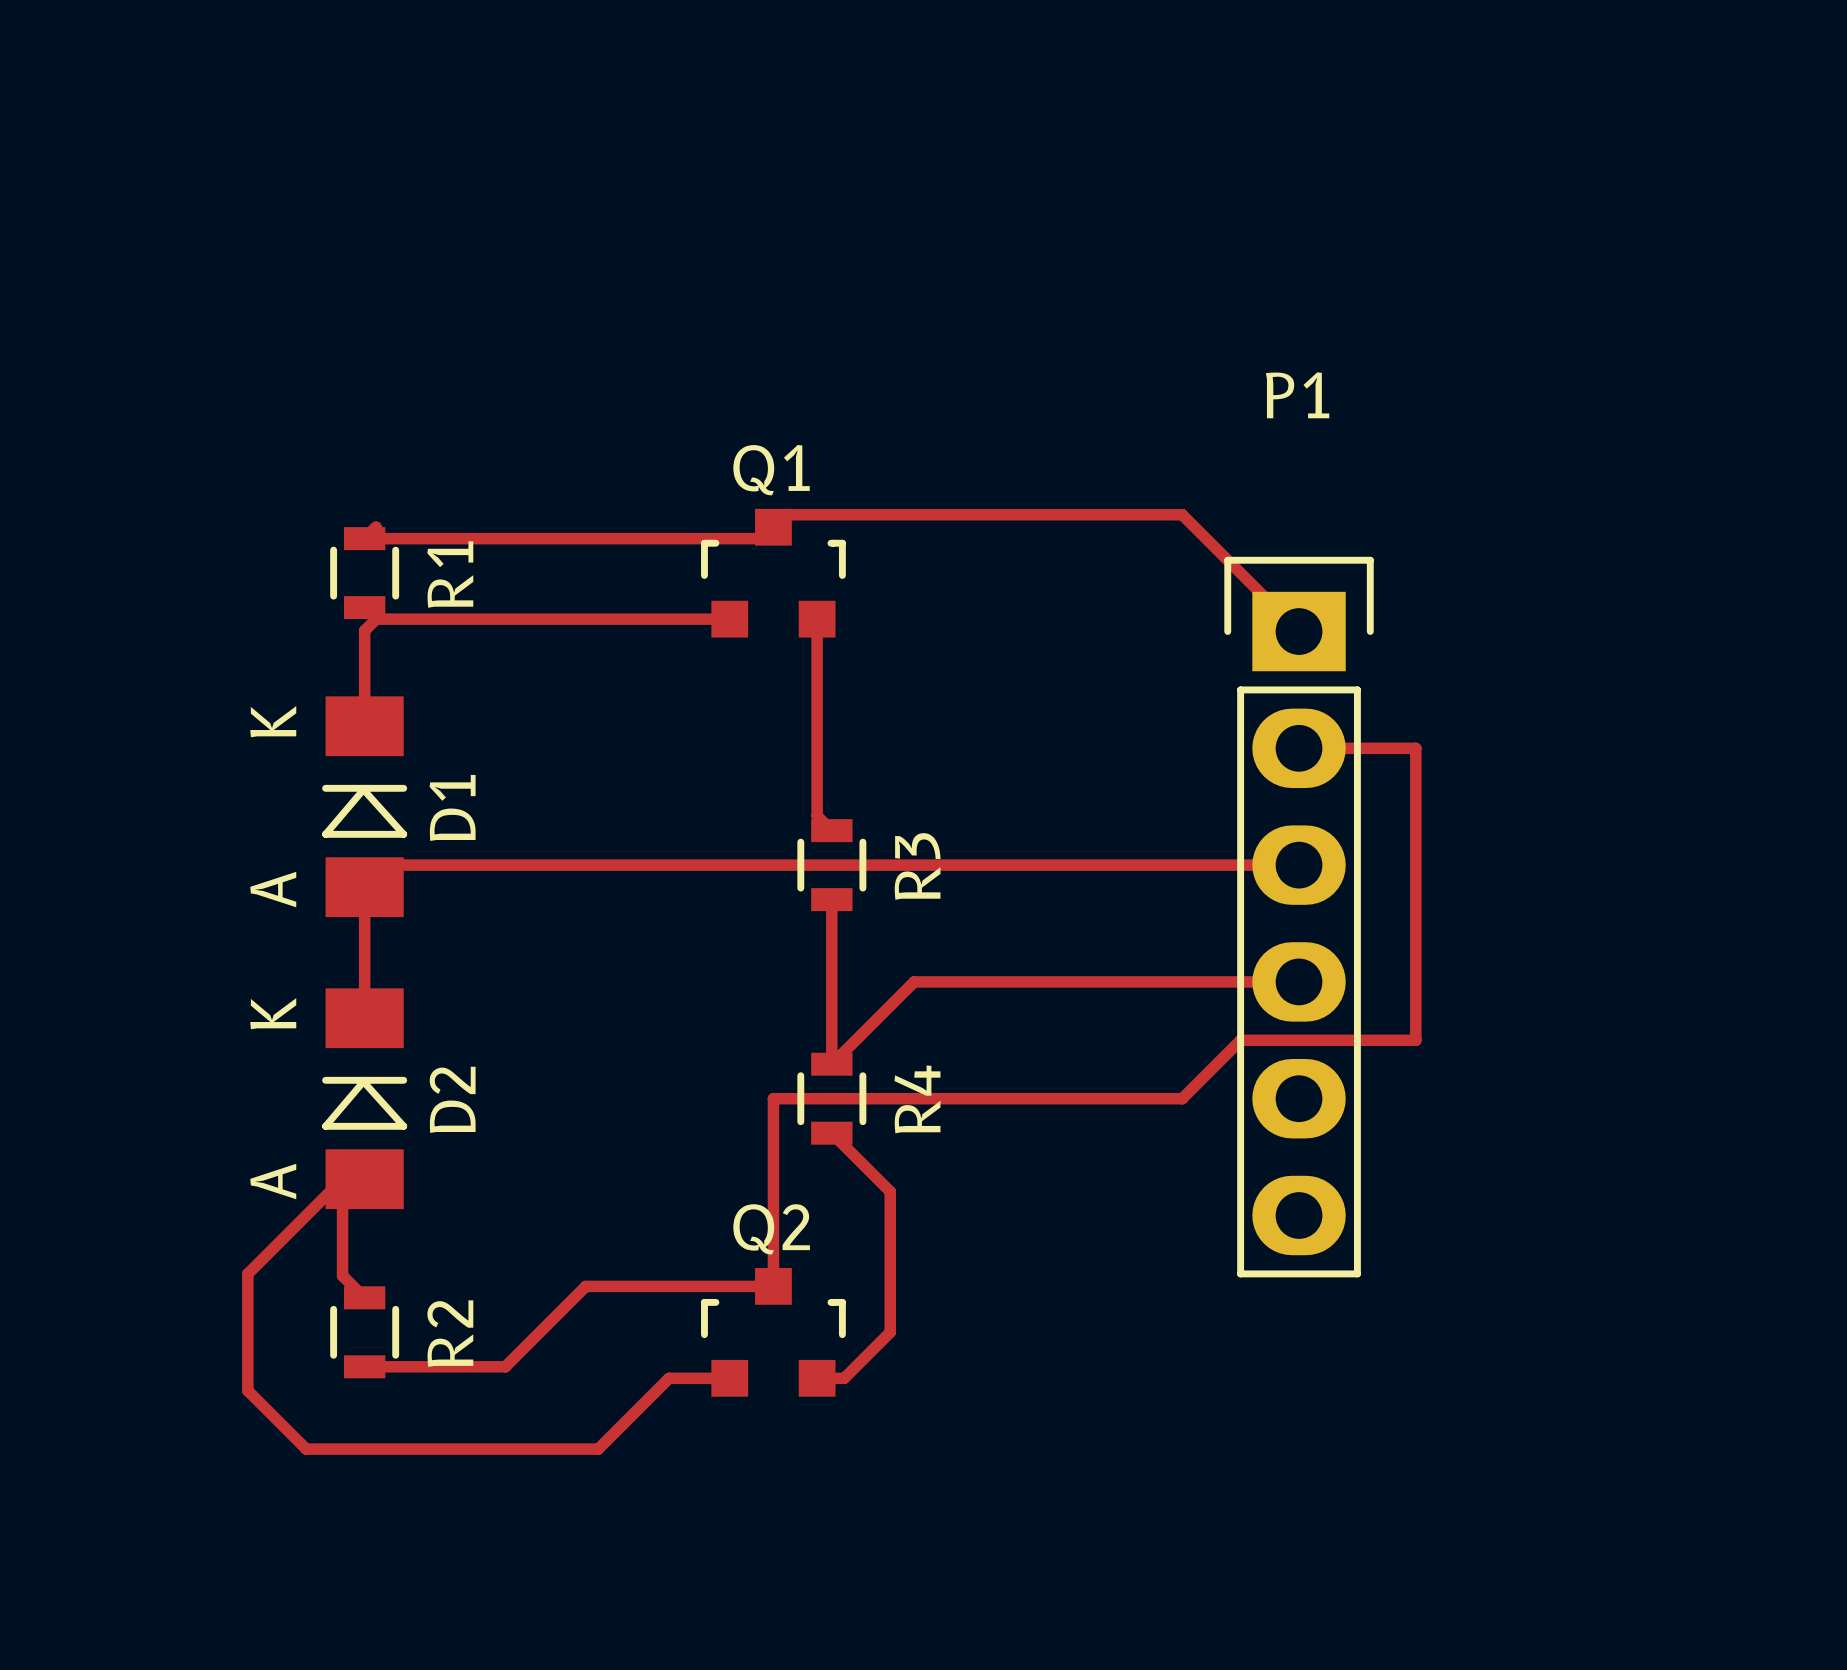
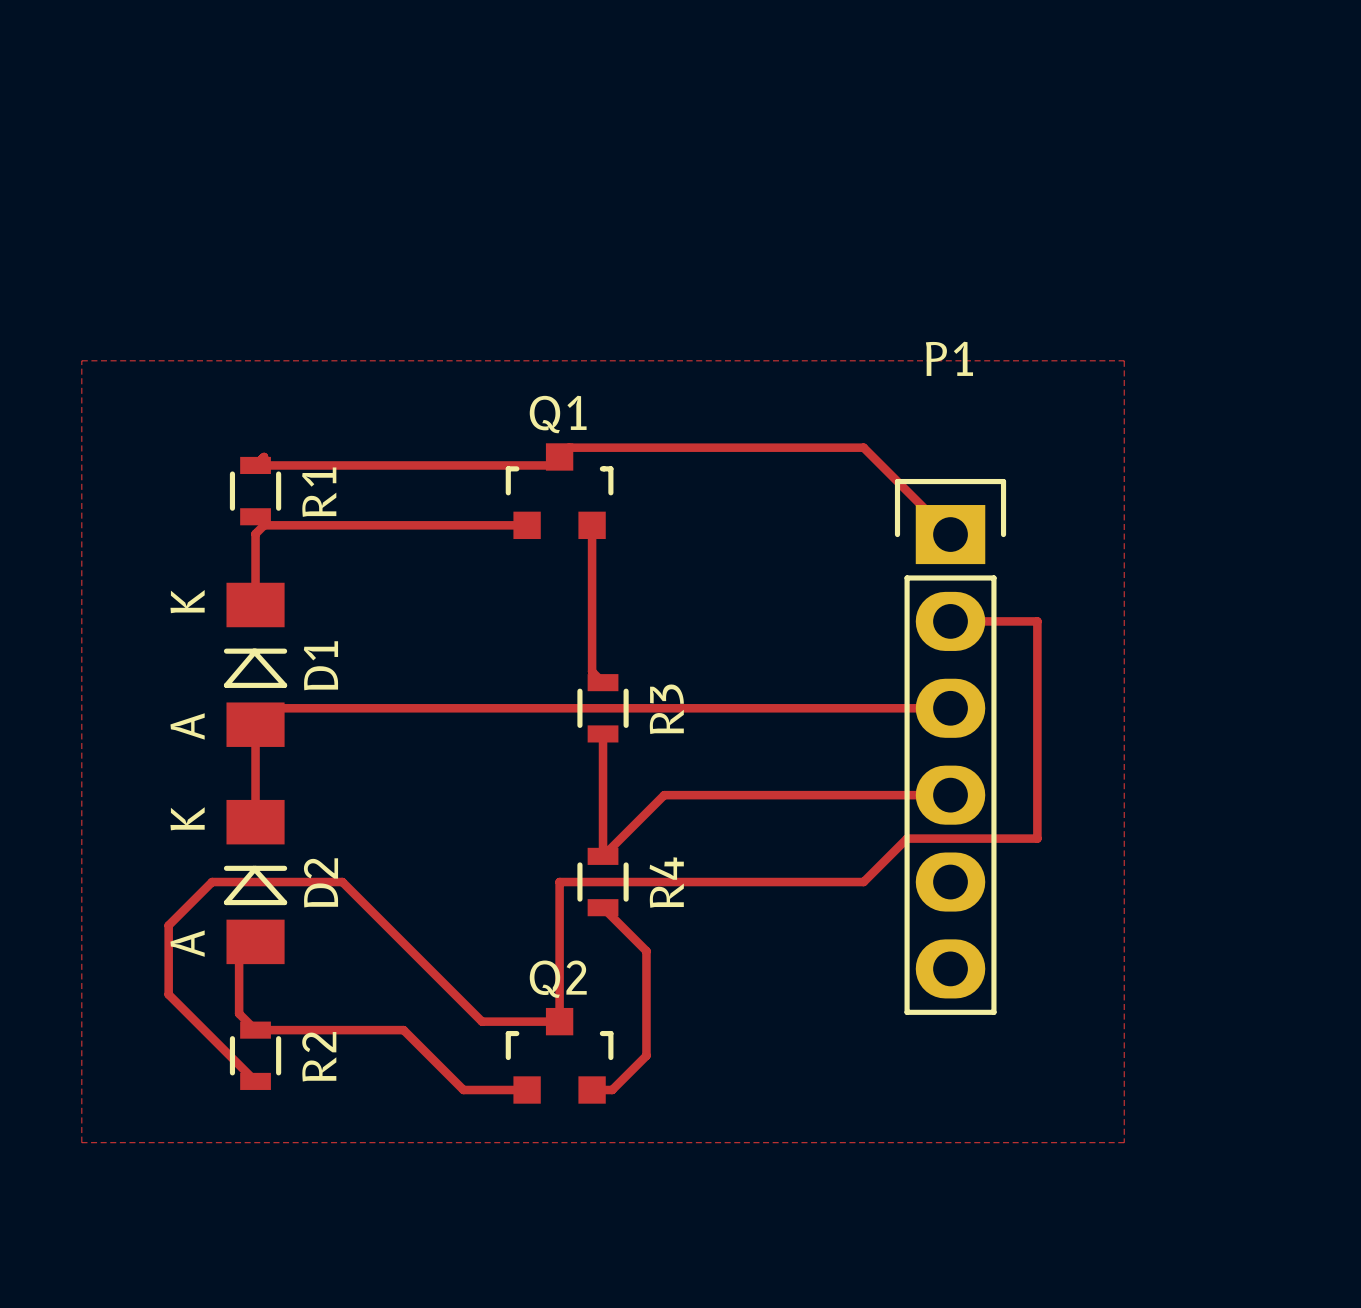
top zone outline: none -> (81, 360) (1124, 360) (1124, 1142) (81, 1142) (81, 360)
top track: (342, 1179) (247, 1273) (247, 1390) (306, 1449) (598, 1449) (669, 1378) -> (255, 1030) (403, 1030) (463, 1090) (481, 1090)
top track: (669, 1286) (585, 1286) (505, 1366) (364, 1366) -> (482, 1021) (342, 882) (212, 882) (168, 925) (168, 994) (255, 1081)

